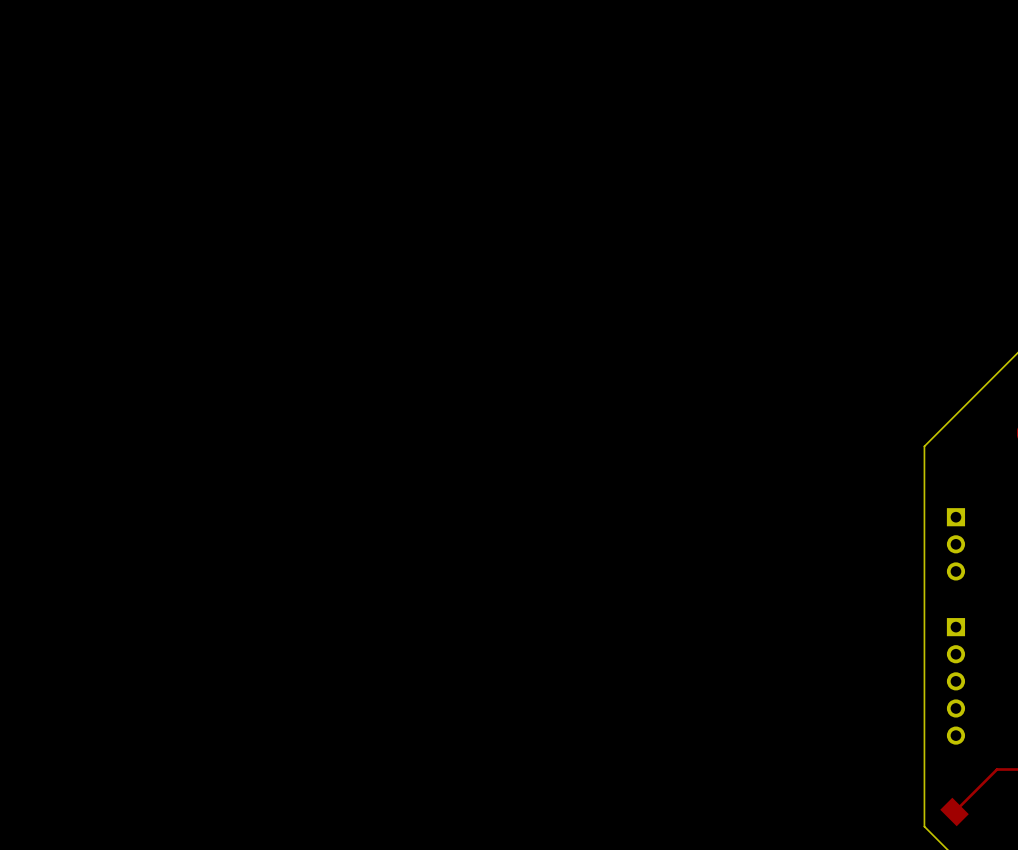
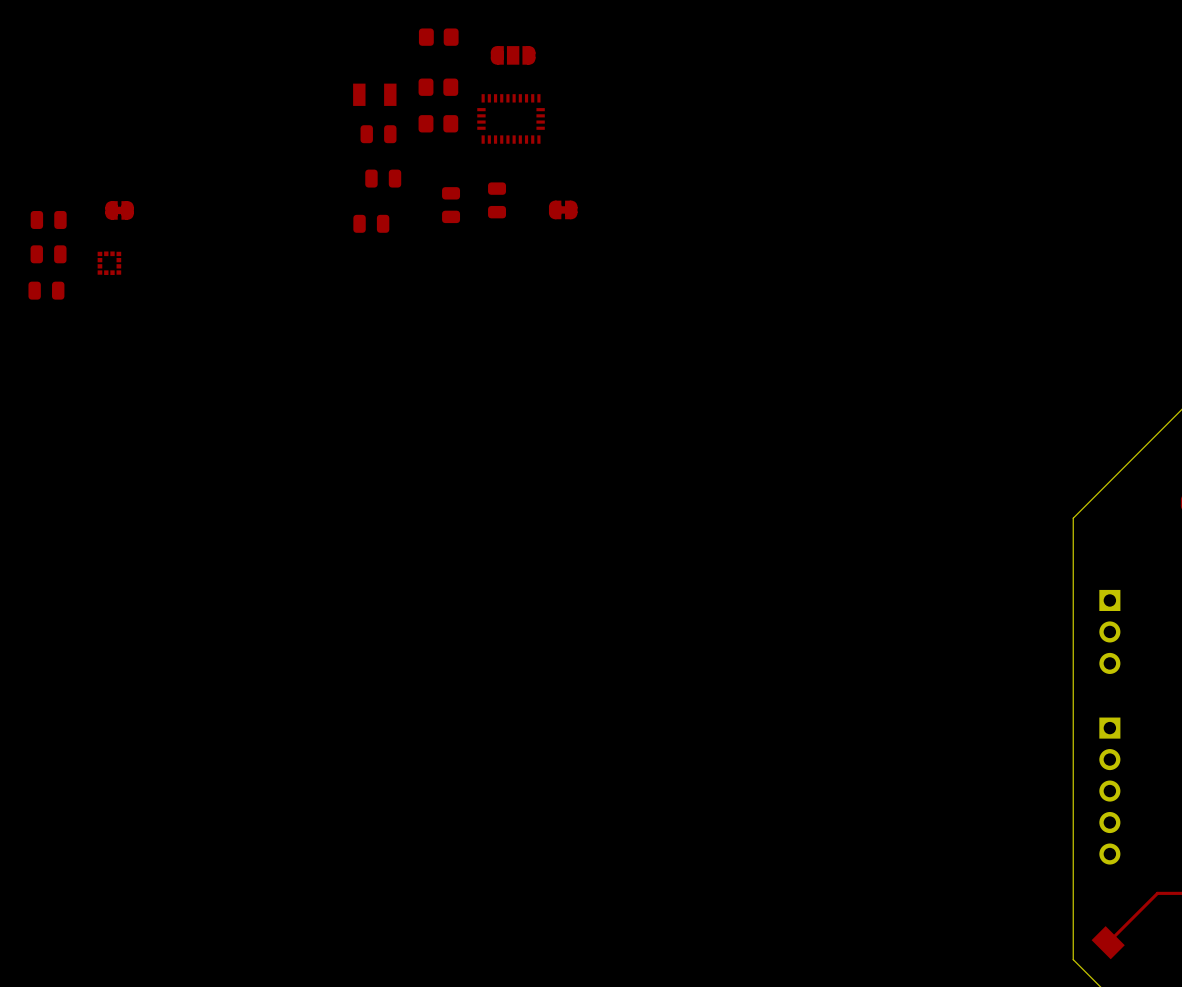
part: none -> (438, 37)
part: none -> (513, 55)
part: none -> (438, 87)
part: none -> (374, 94)
part: none -> (511, 118)
part: none -> (438, 123)
part: none -> (378, 134)
part: none -> (383, 178)
part: none -> (497, 200)
part: none -> (451, 205)
part: none -> (563, 209)
part: none -> (119, 210)
part: none -> (48, 219)
part: none -> (371, 223)
part: none -> (48, 254)
part: none -> (109, 263)
part: none -> (46, 290)

